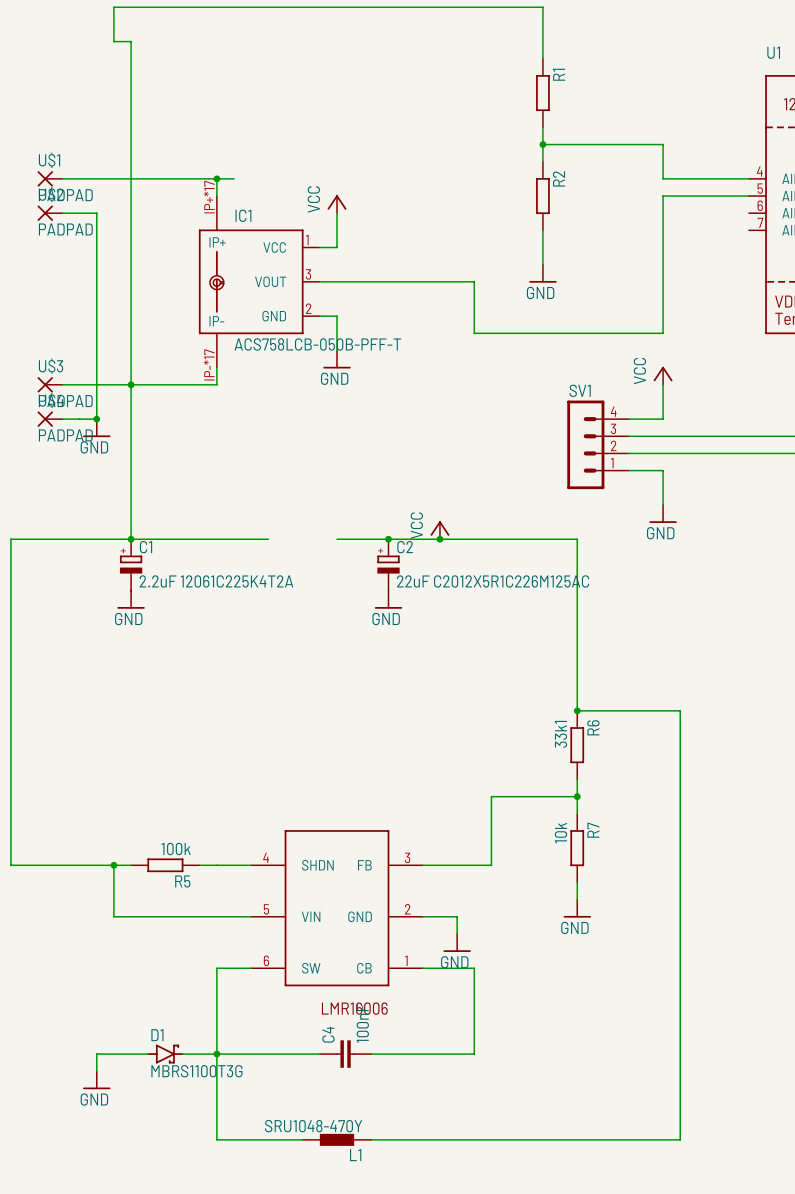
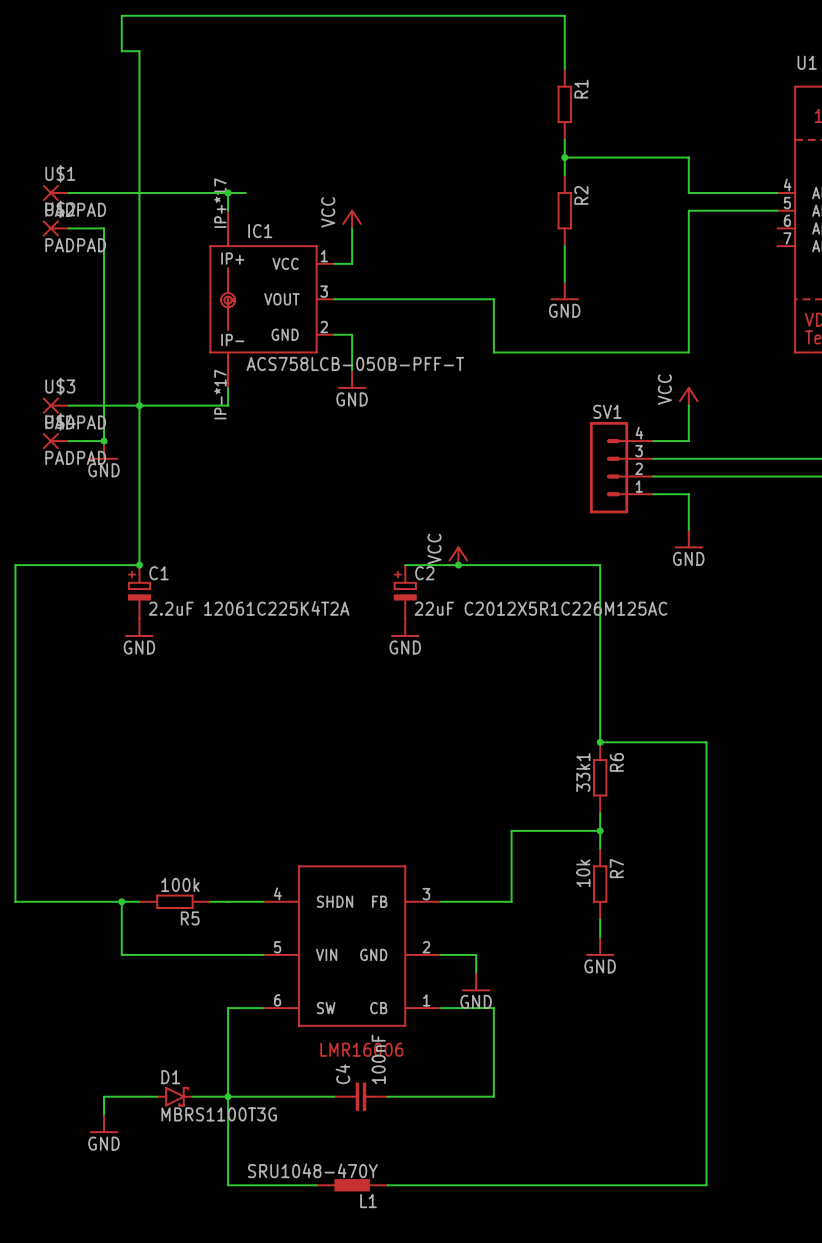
wire: (131, 539) (268, 539) -> none
wire: (337, 539) (388, 539) -> none
junction: (388, 539) -> none

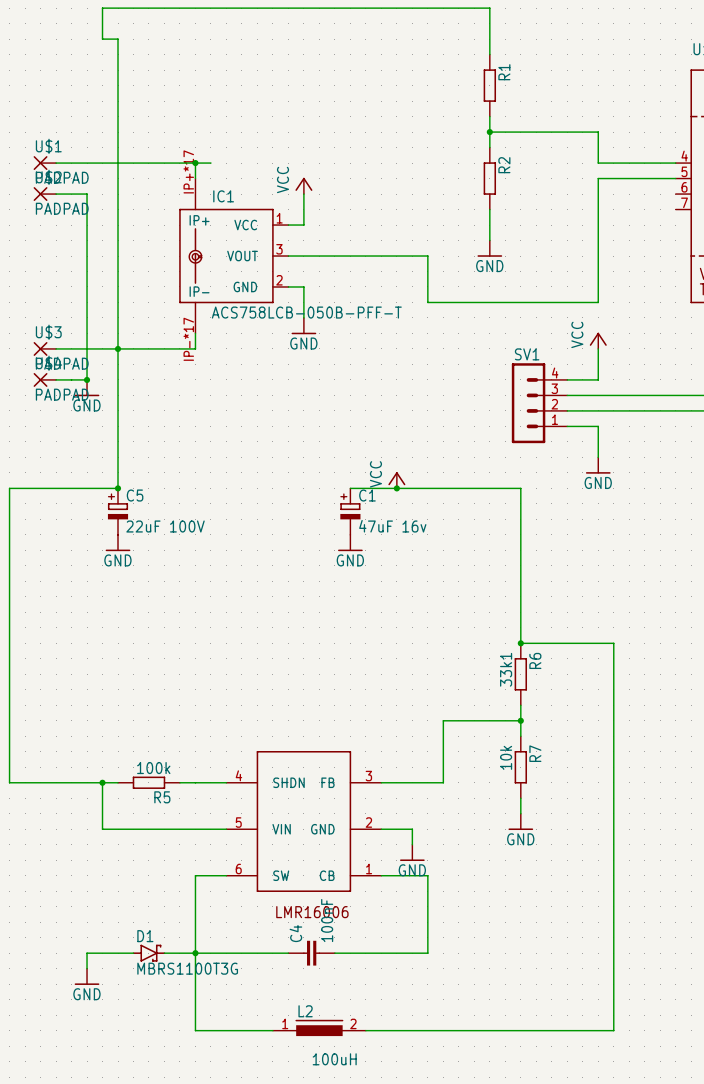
C1 name: C1 (159, 573) -> C5 (135, 495)
C2 name: C2 (424, 573) -> C1 (367, 495)
C1 value: 2.2uF 12061C225K4T2A (249, 608) -> 22uF 100V (165, 526)
C2 value: 22uF C2012X5R1C226M125AC (540, 608) -> 47uF 16v (392, 526)
L2: none -> 100uH (319, 1027)
L1: SRU1048-470Y (352, 1185) -> none

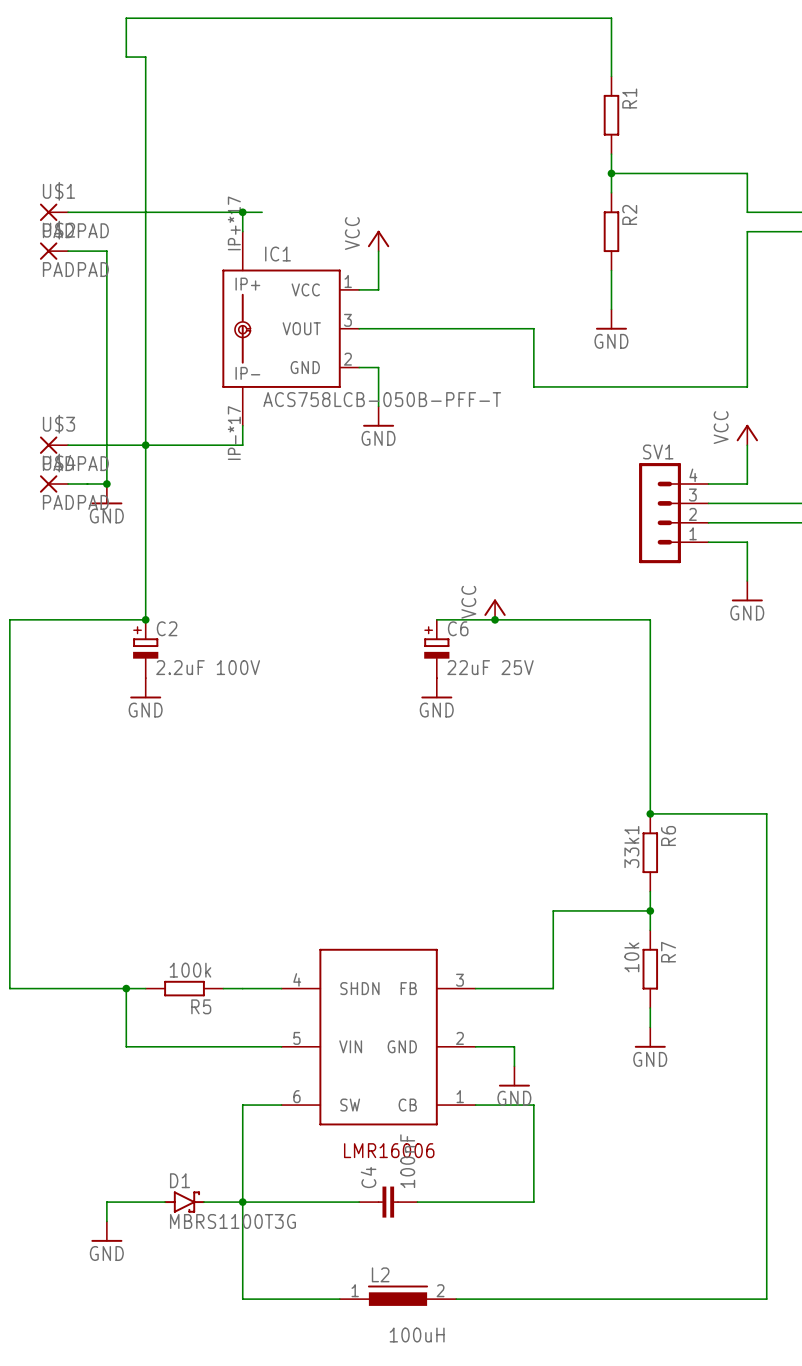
C5 name: C5 (135, 495) -> C2 (167, 628)
C1 name: C1 (367, 495) -> C6 (458, 628)
C5 value: 22uF 100V (165, 526) -> 2.2uF 100V (208, 667)
C1 value: 47uF 16v (392, 526) -> 22uF 25V (490, 667)

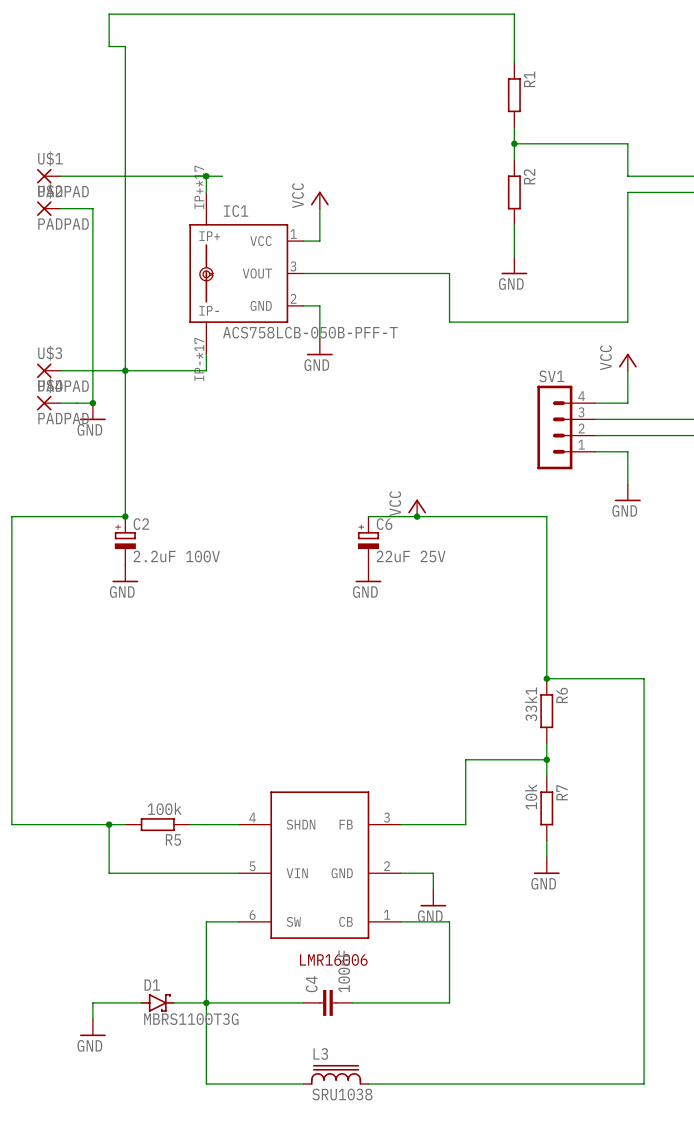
L3: none -> SRU1038 (336, 1074)
L2: 100uH (398, 1295) -> none

